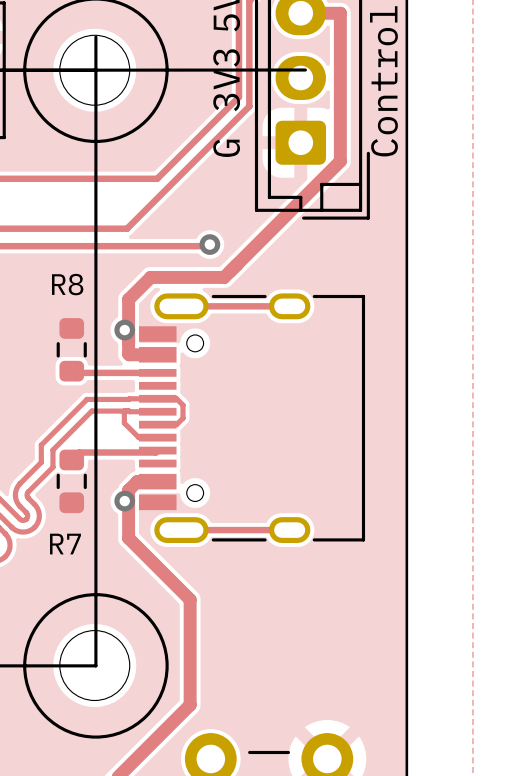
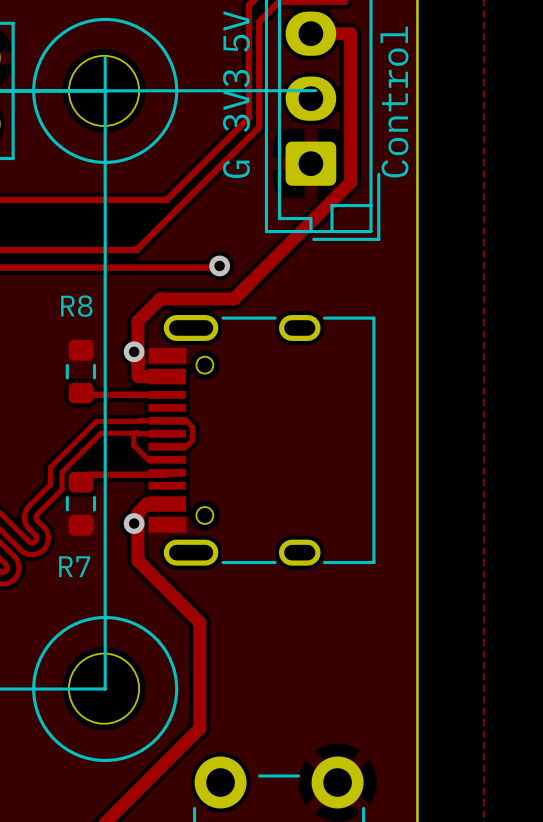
track: (181, 306) (289, 306) -> none
track: (181, 530) (289, 530) -> none

